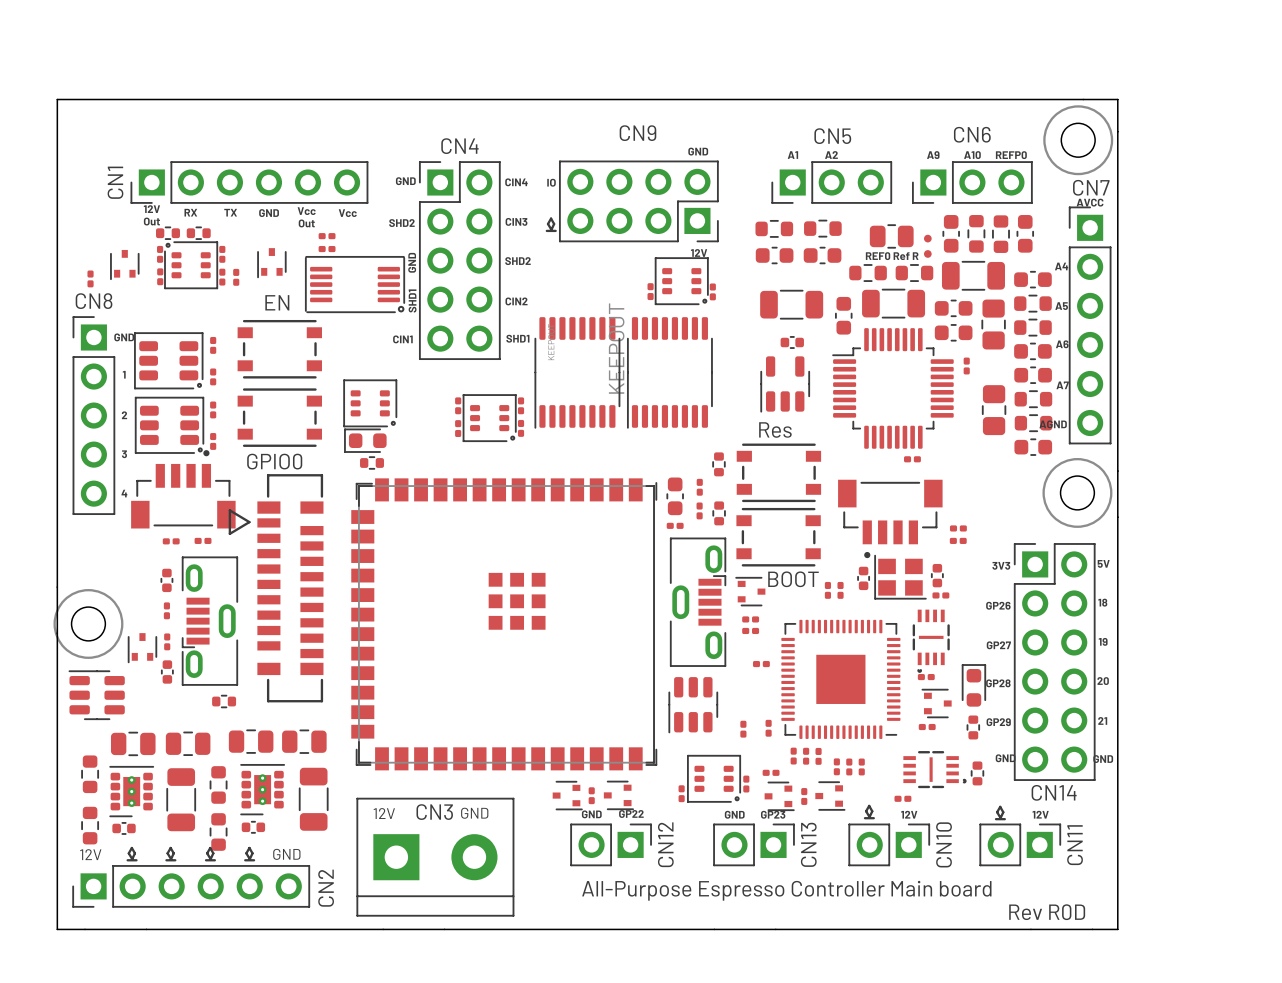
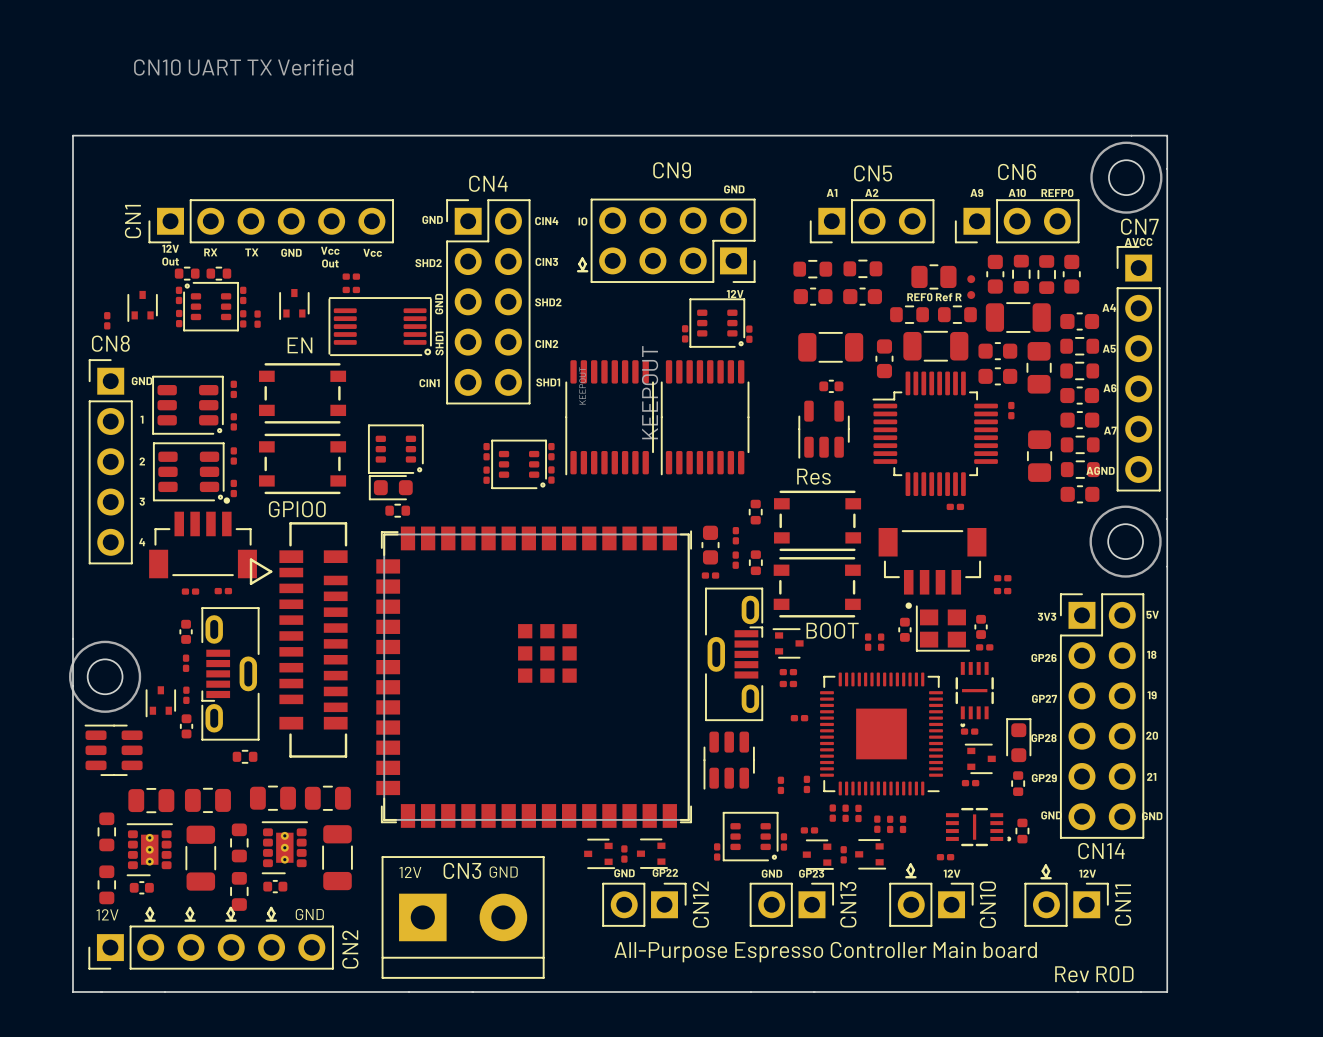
text: none -> CN10 UART TX Verified (243, 67)

